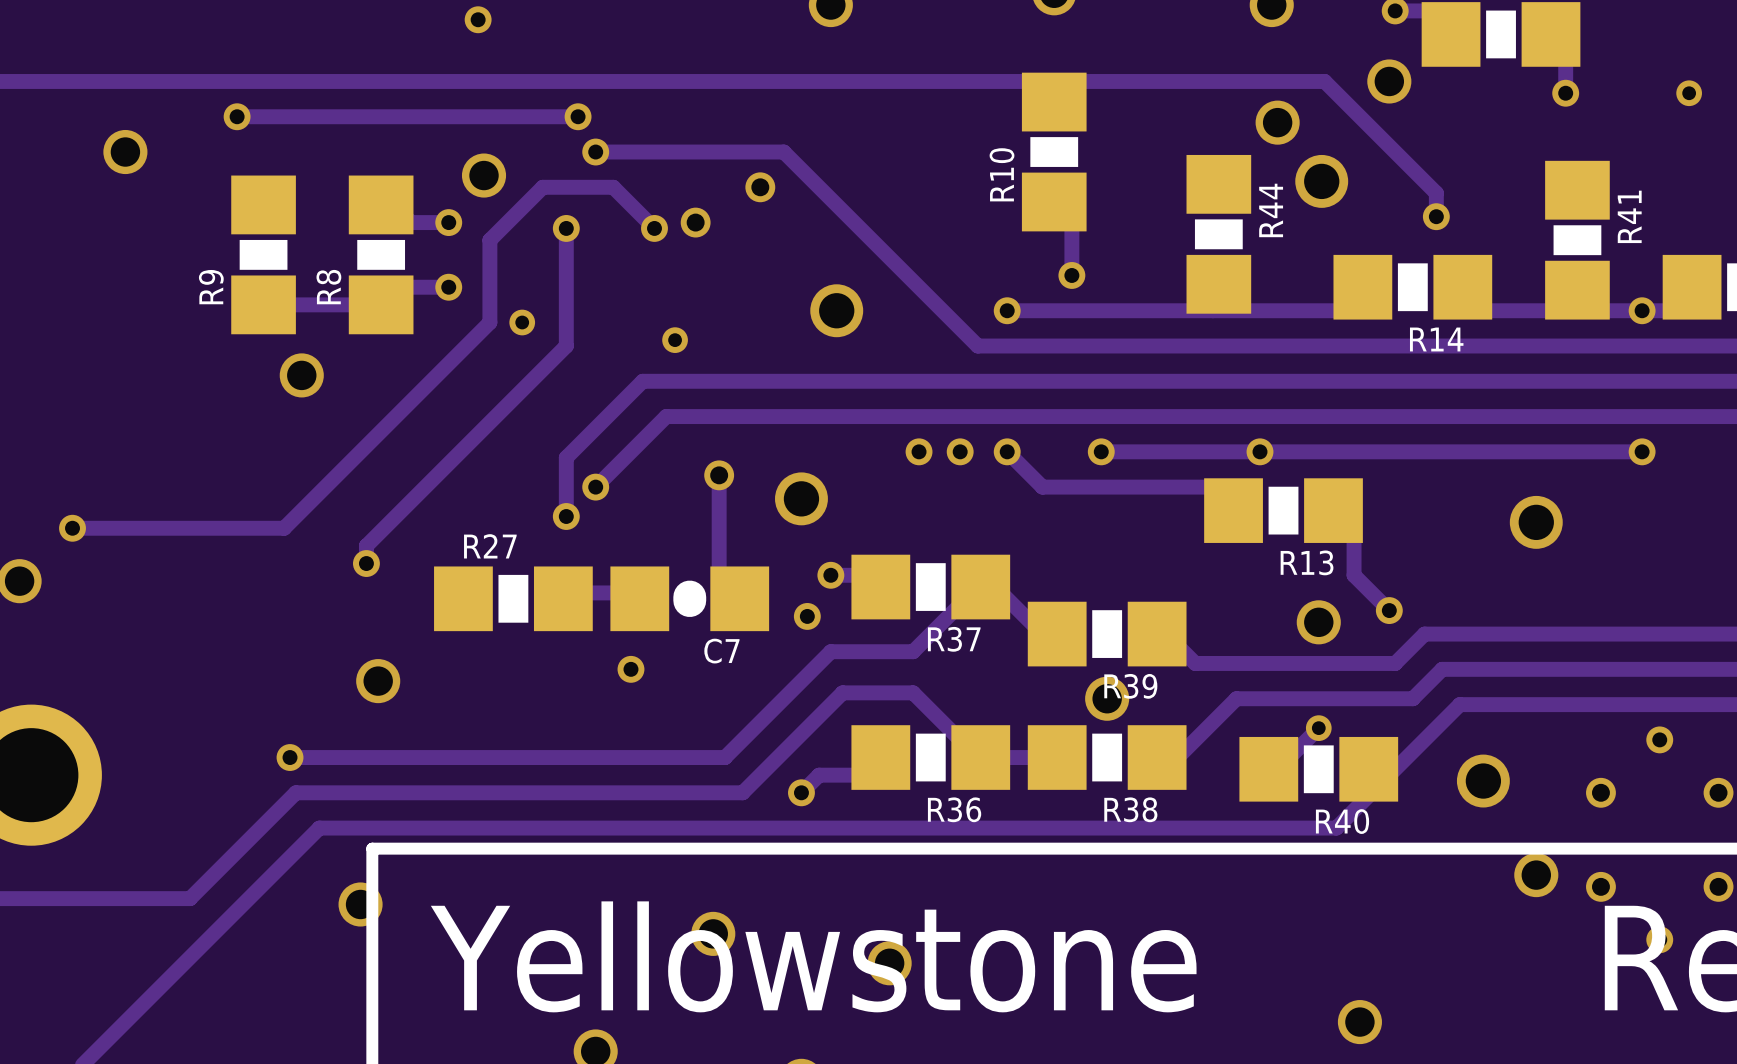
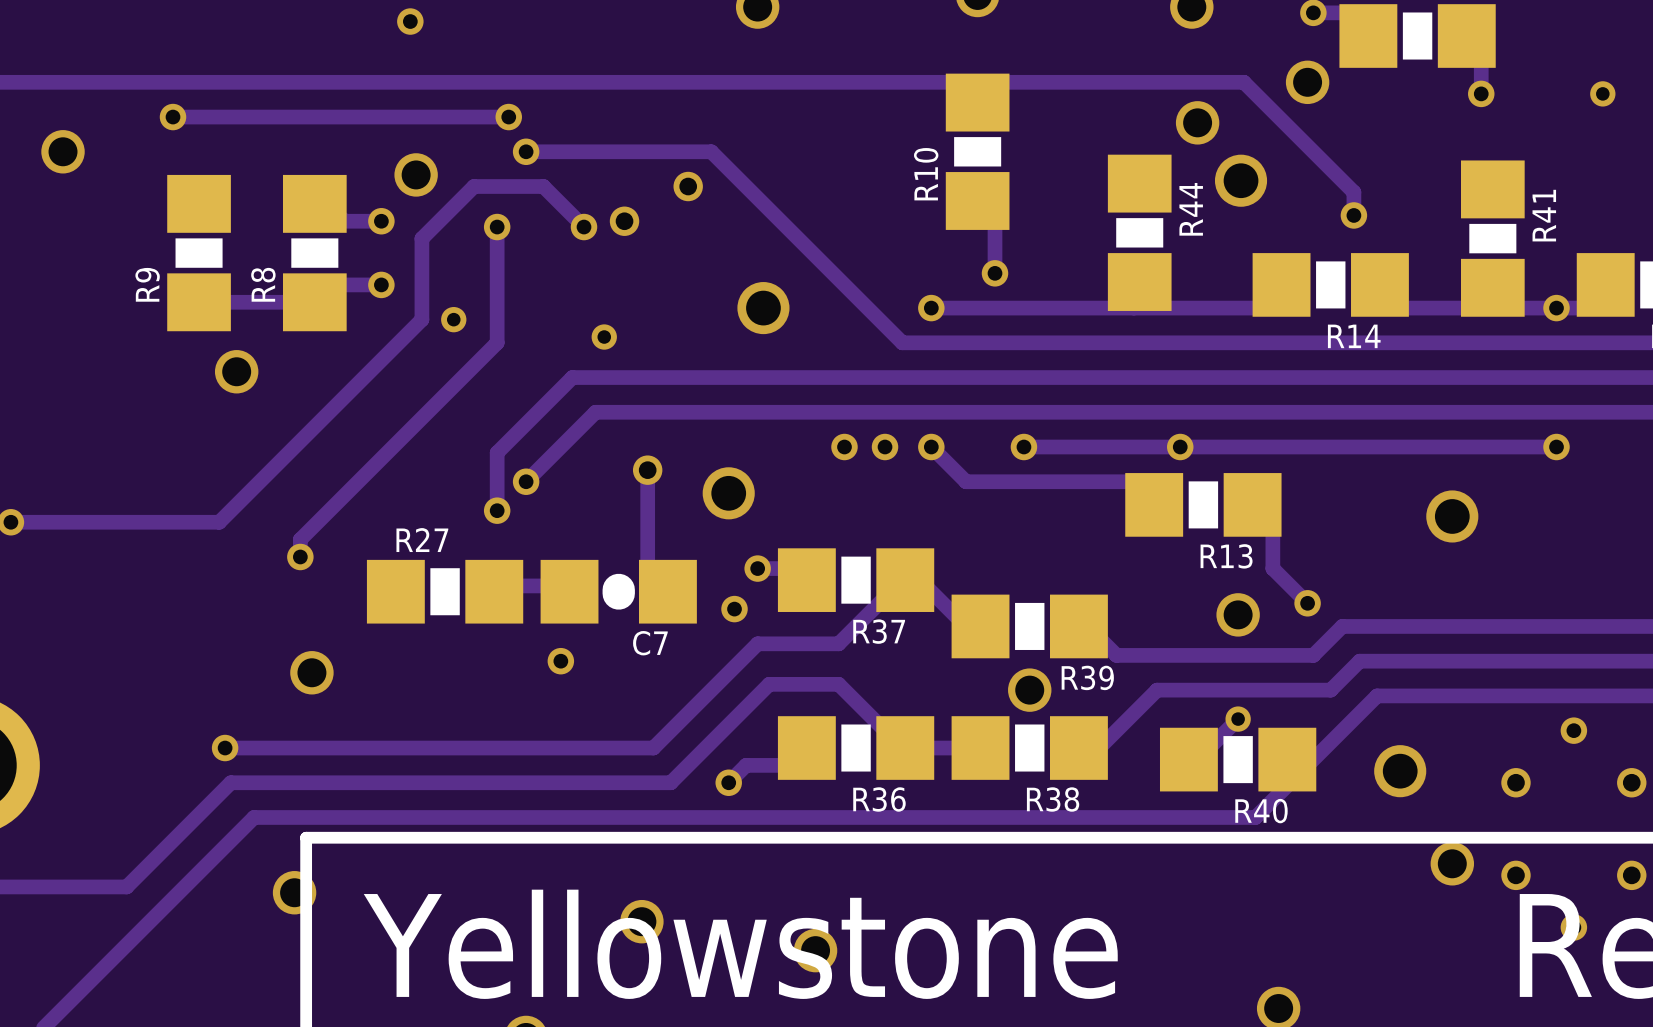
R39 name position: R39 (1130, 686) -> R39 (1087, 677)

